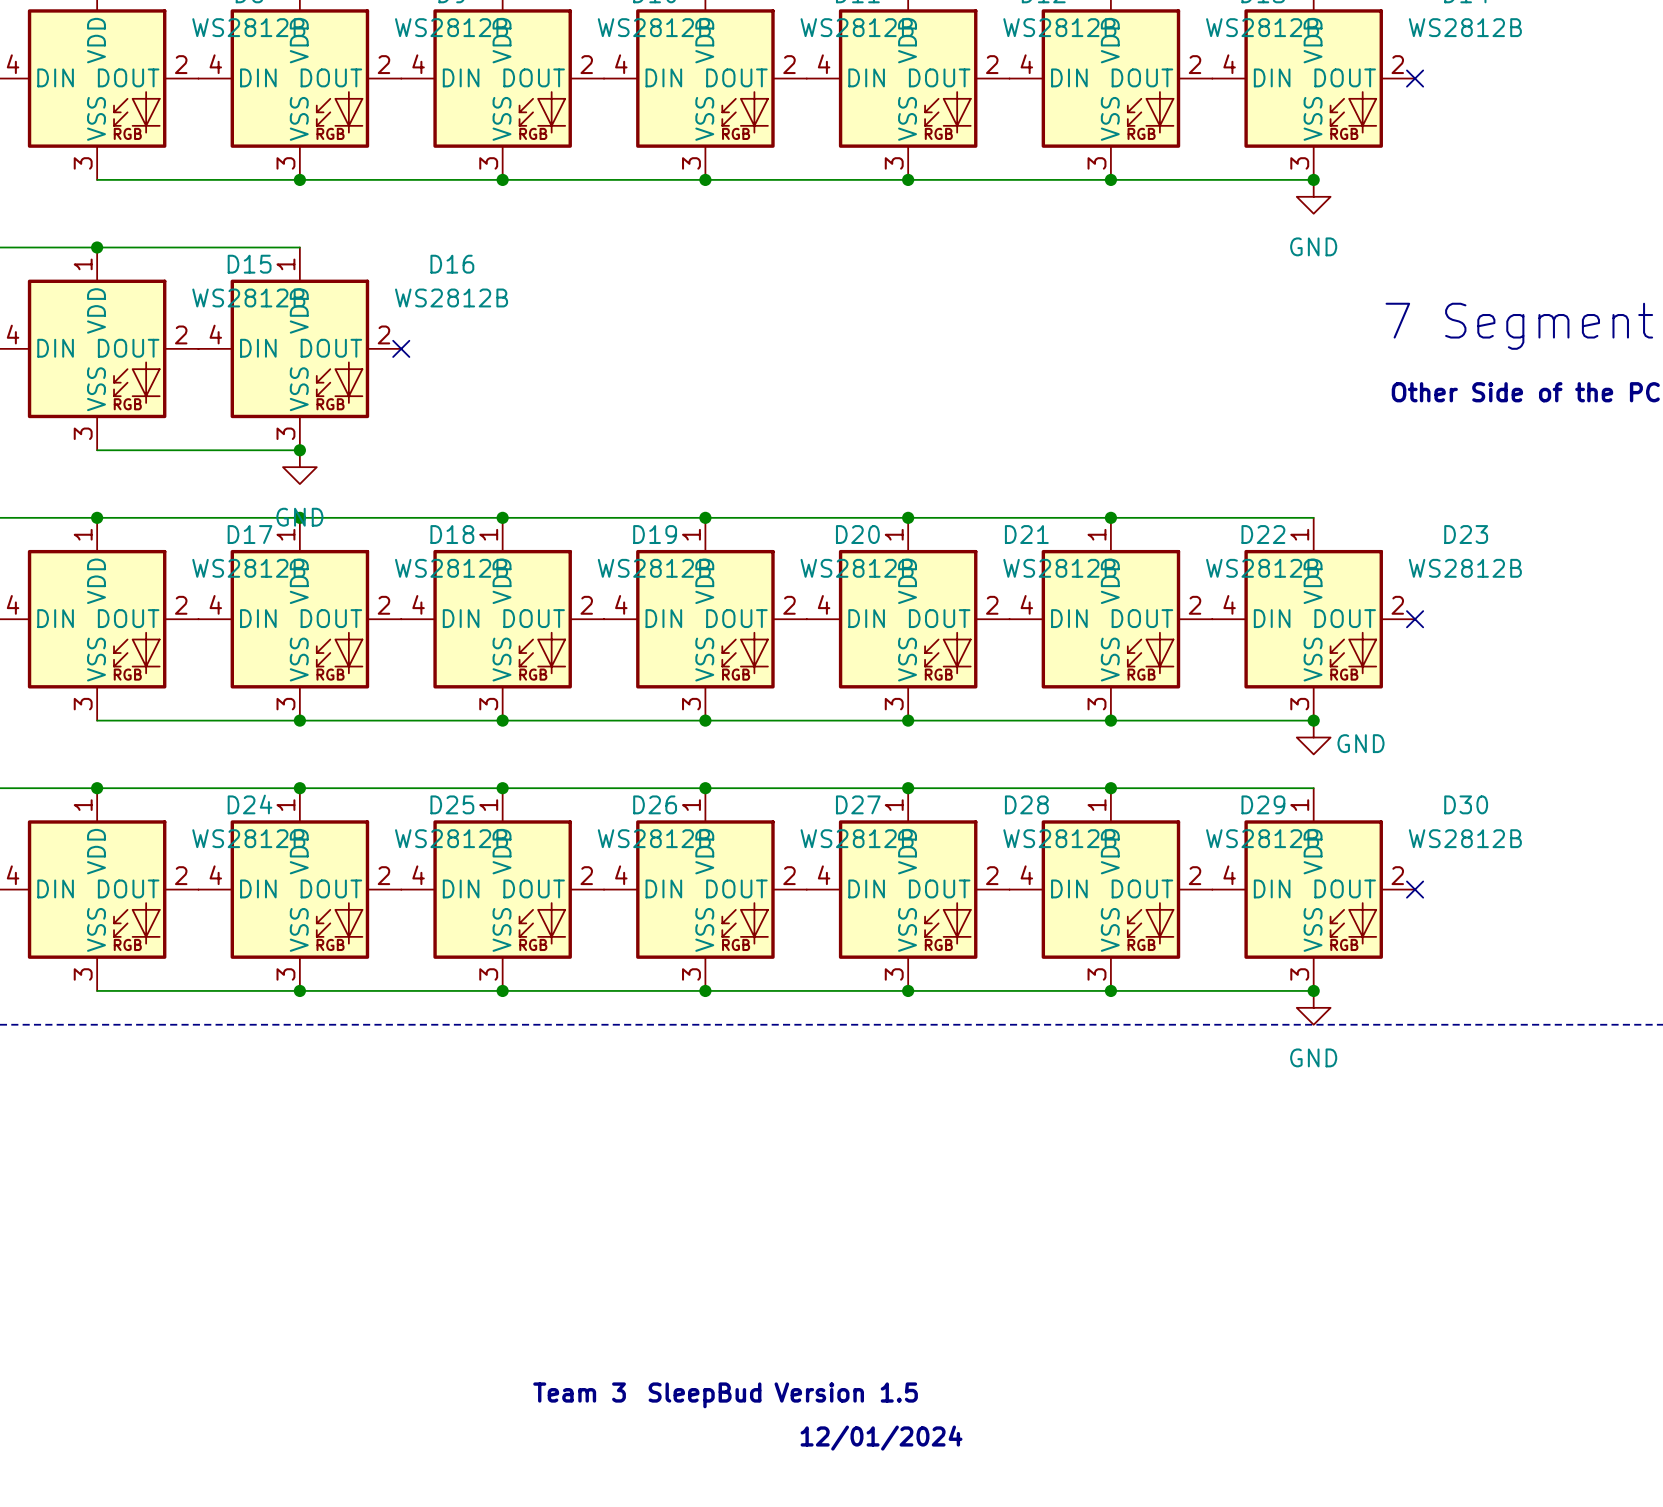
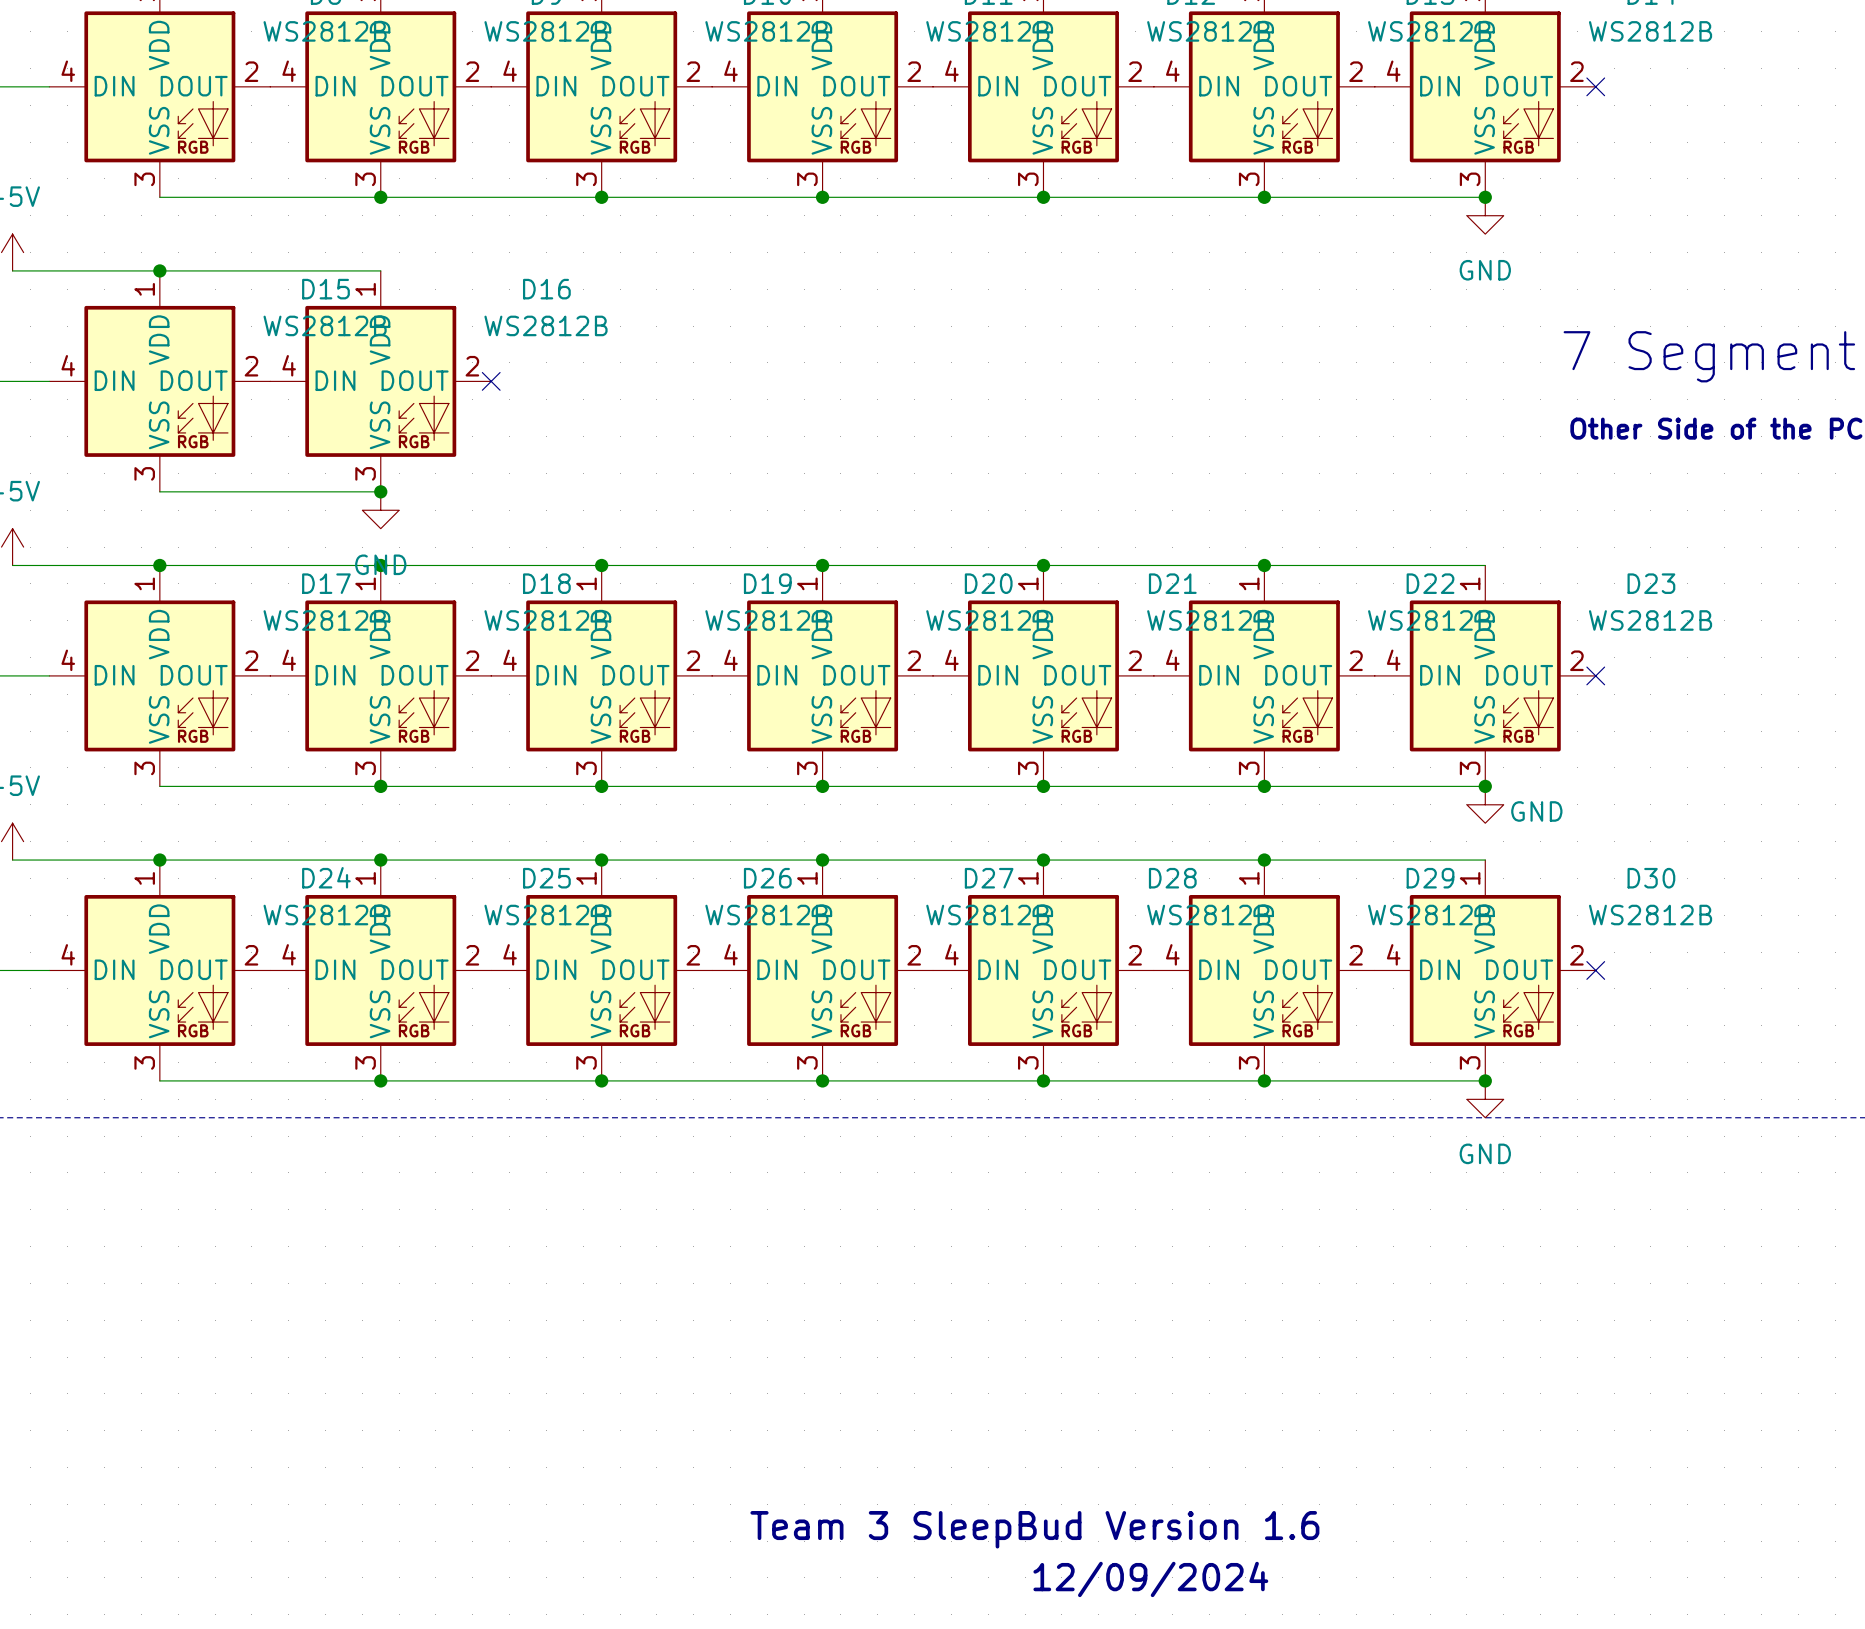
text: Team 3 (579, 1392) -> none
text: Version 1.5 (846, 1392) -> none
text: SleepBud (705, 1395) -> none
text: none -> Team 3 SleepBud Version 1.6 (1034, 1529)
text: 12/01/2024 (881, 1438) -> 12/09/2024 (1150, 1579)

